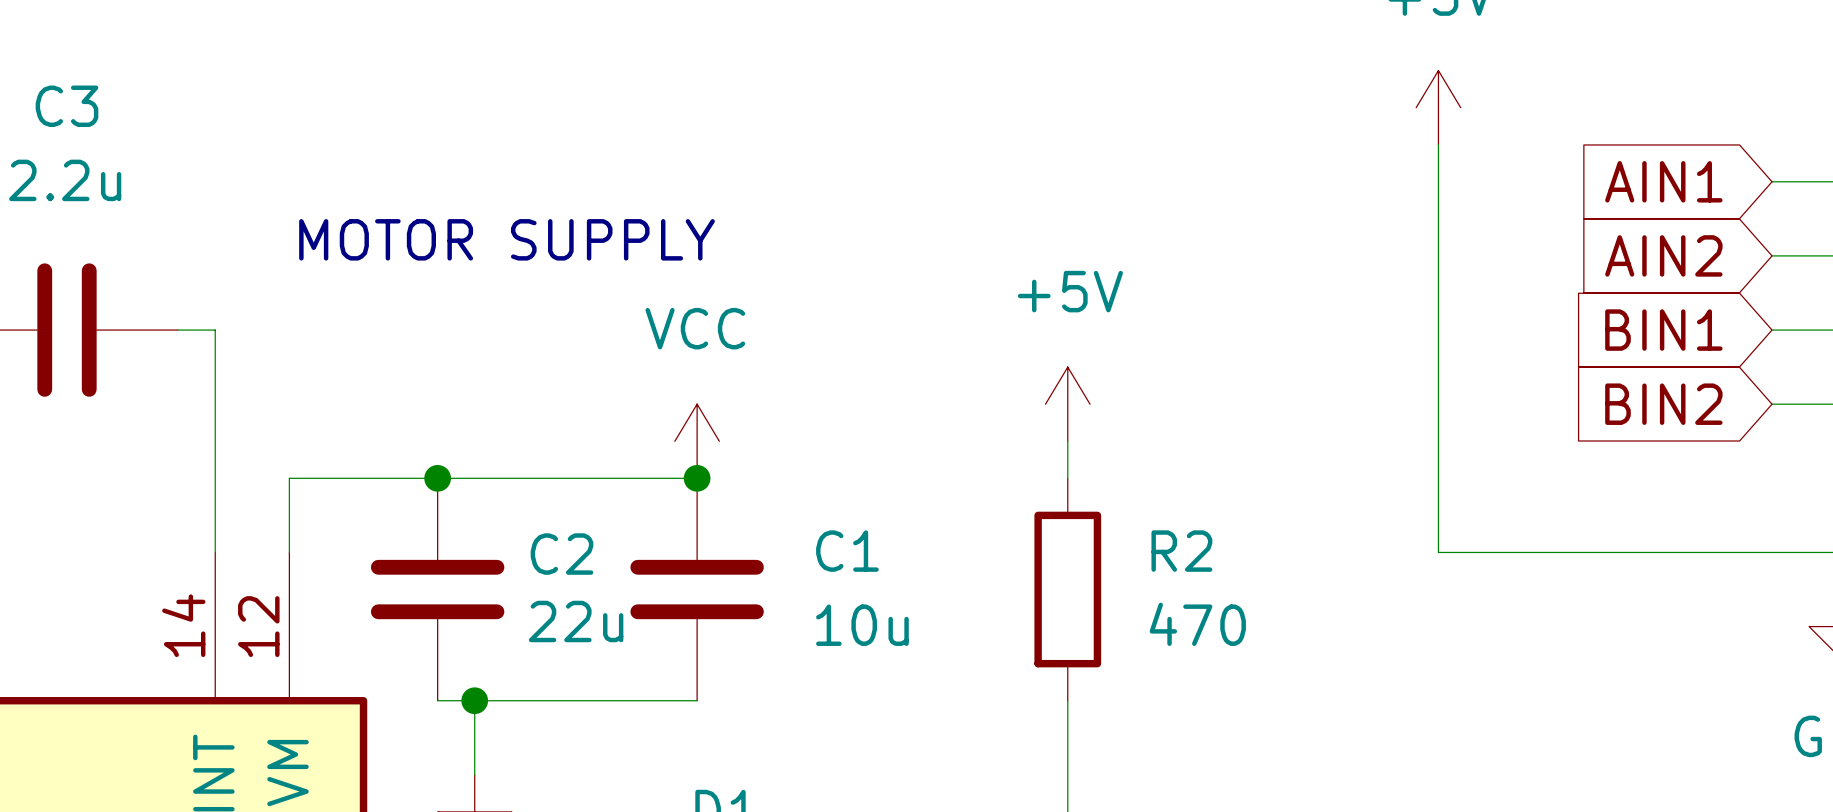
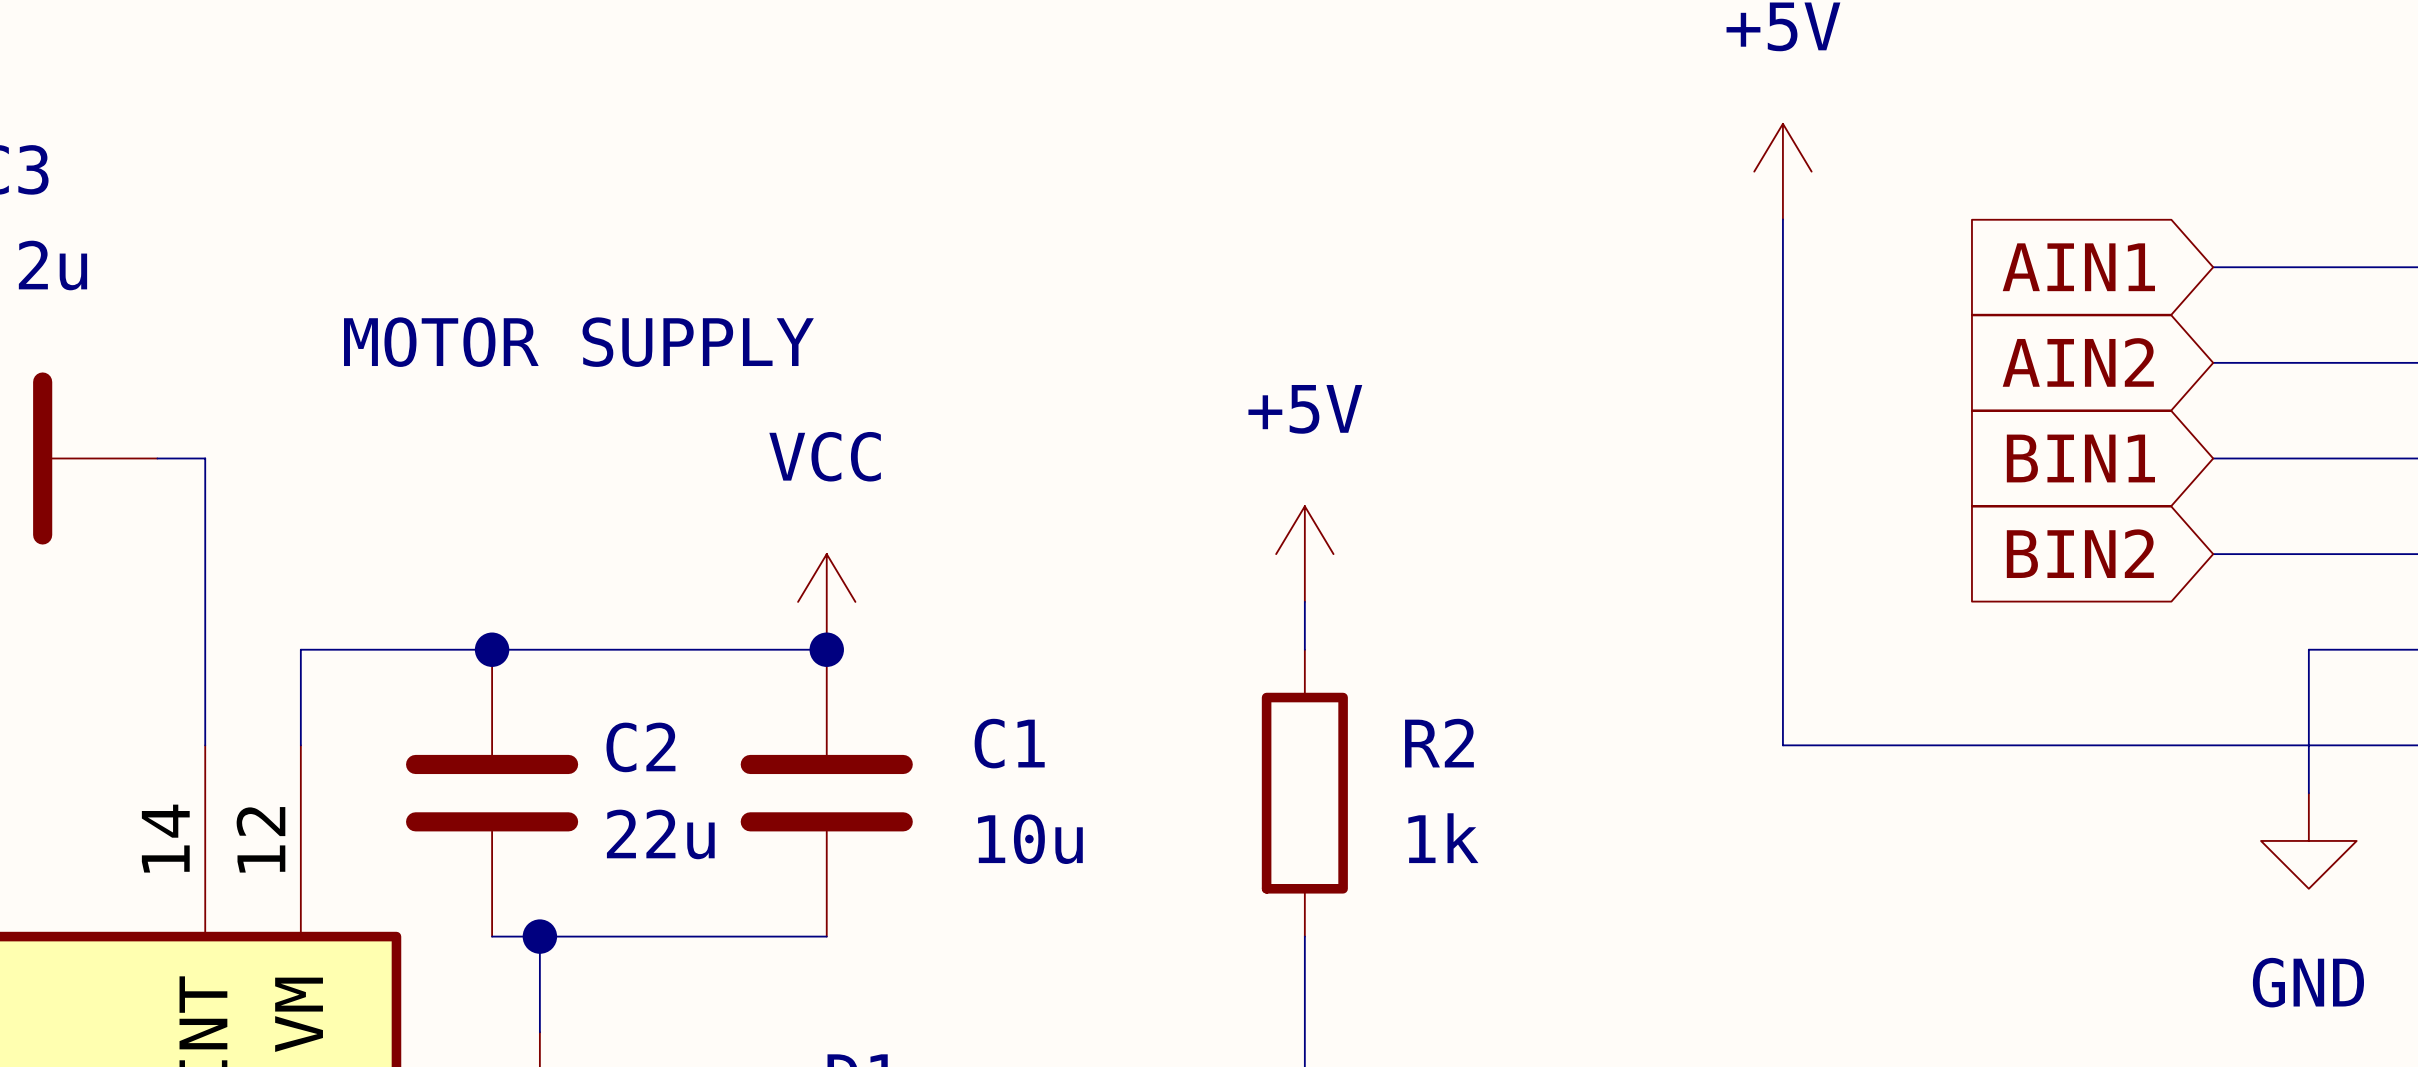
R2 value: 470 (1197, 624) -> 1k (1443, 838)

